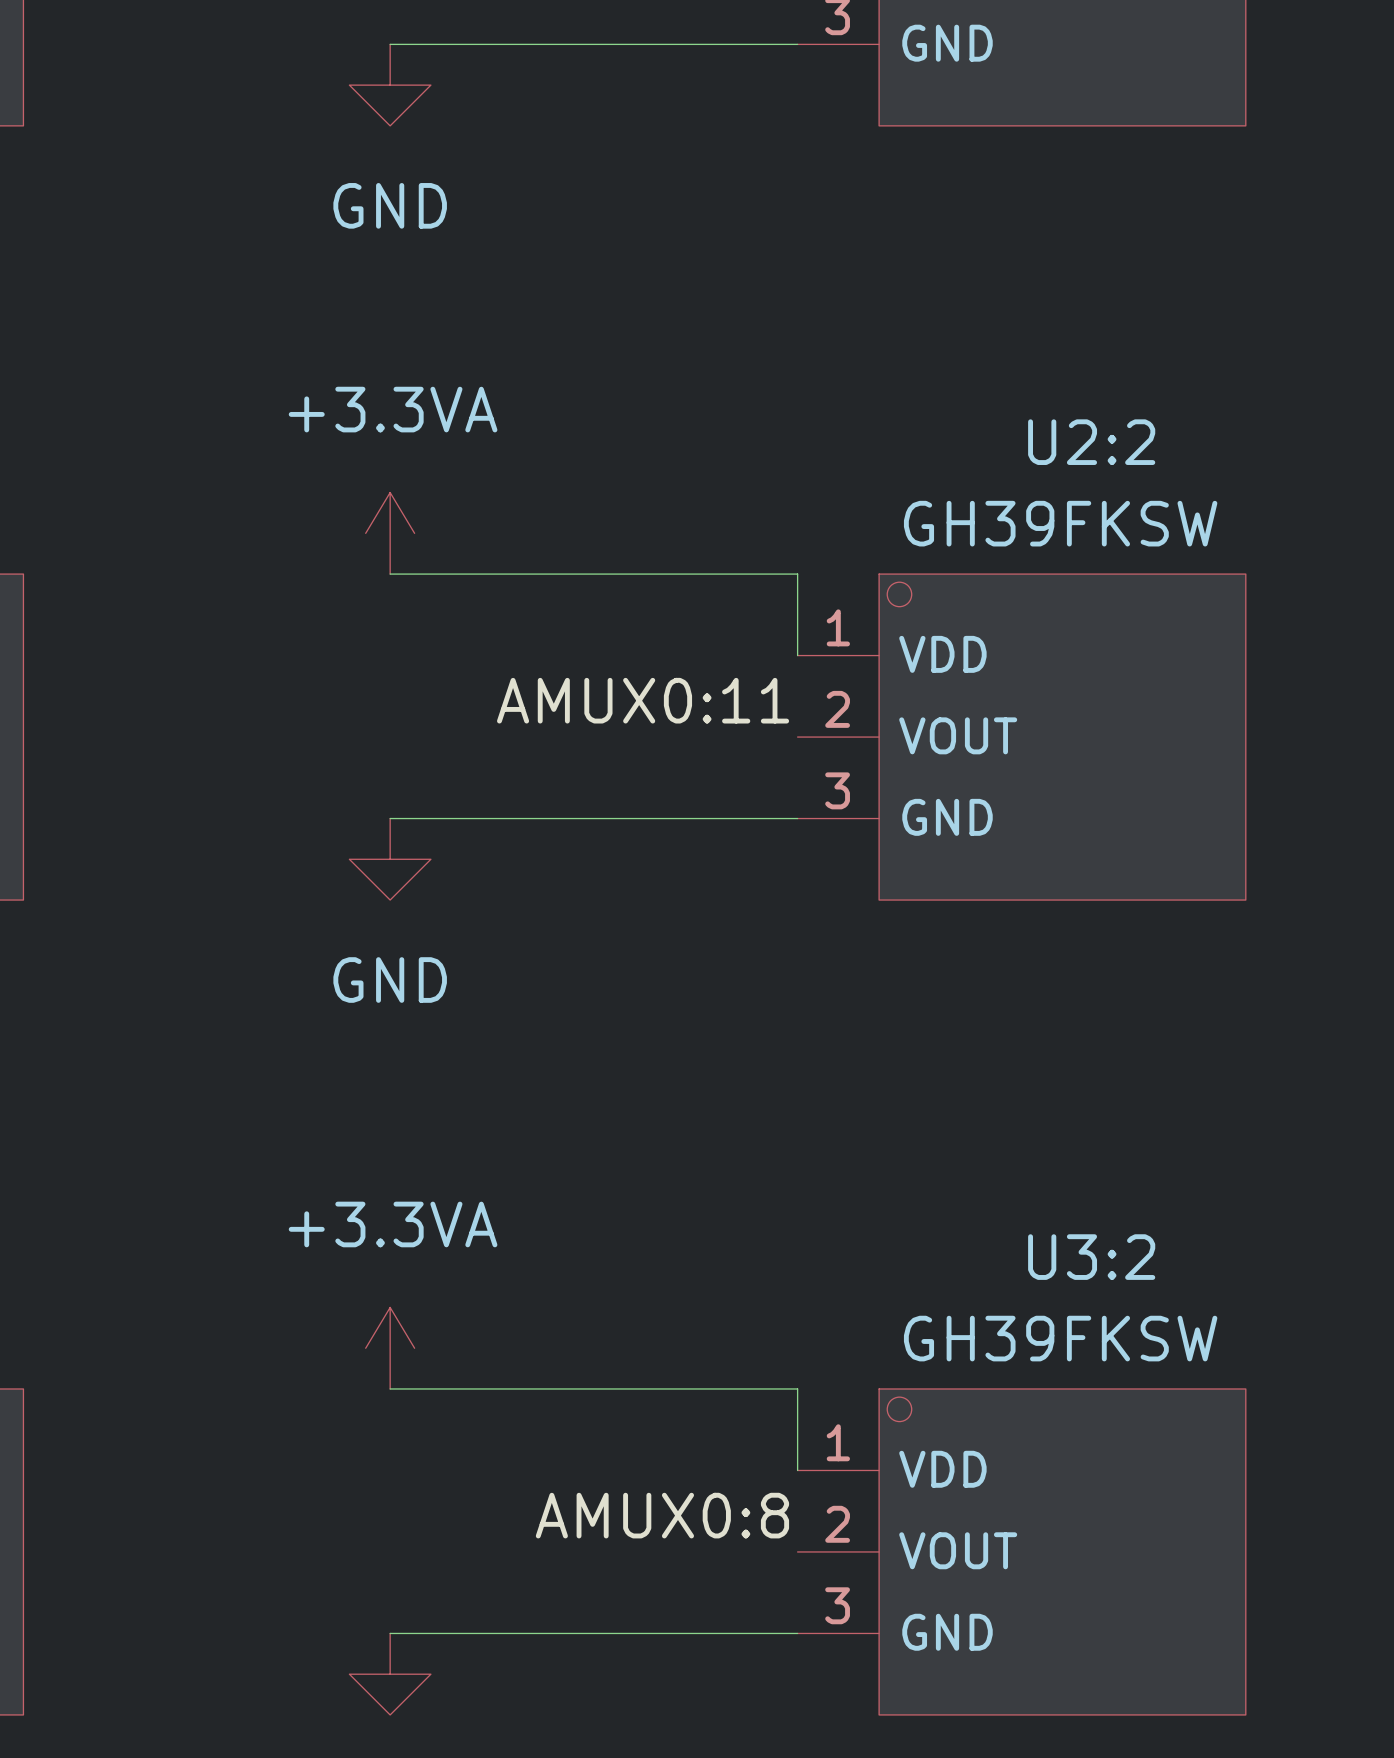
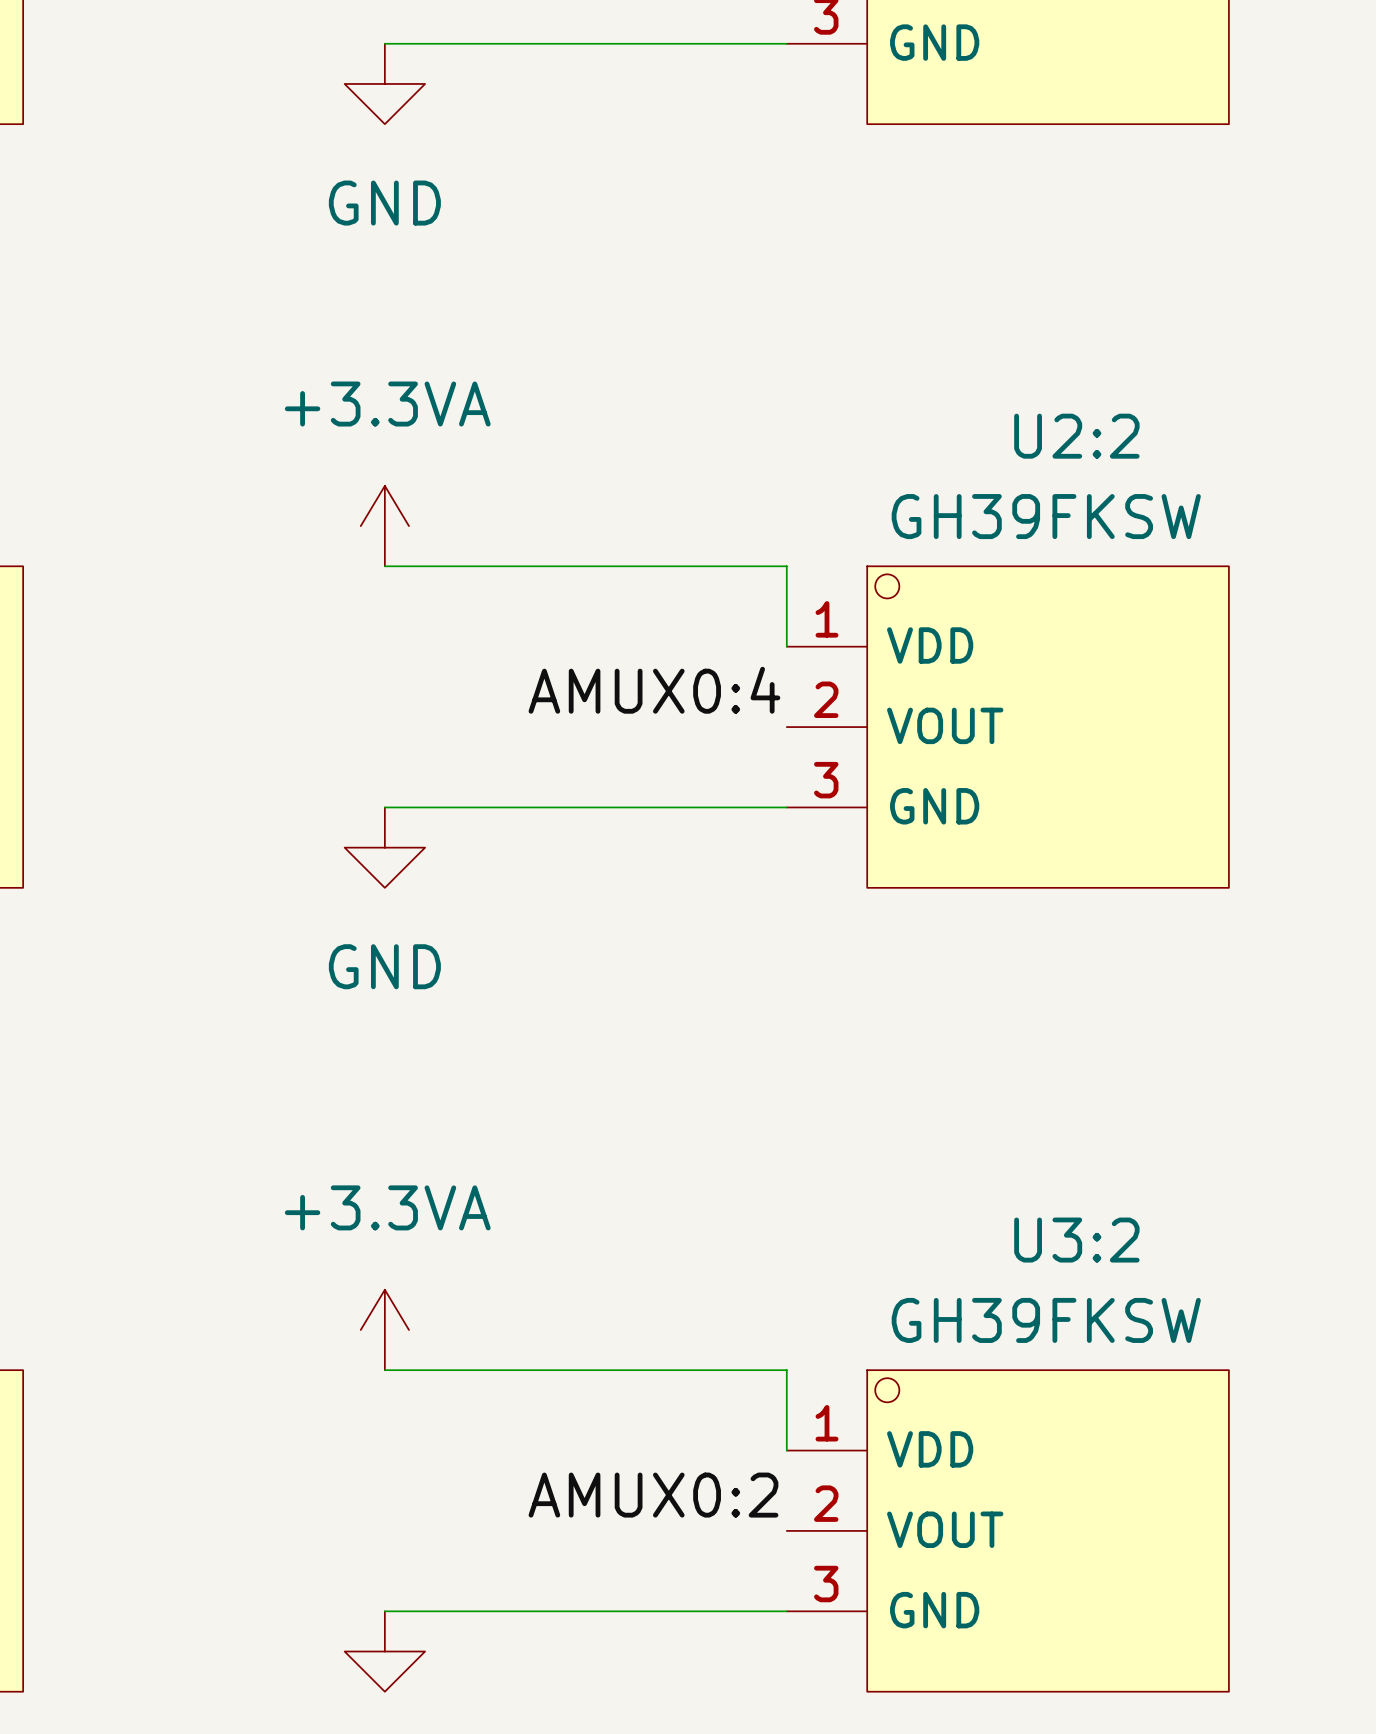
label: AMUX0:11 (643, 700) -> AMUX0:4 (654, 690)
label: AMUX0:8 (662, 1515) -> AMUX0:2 (653, 1495)

